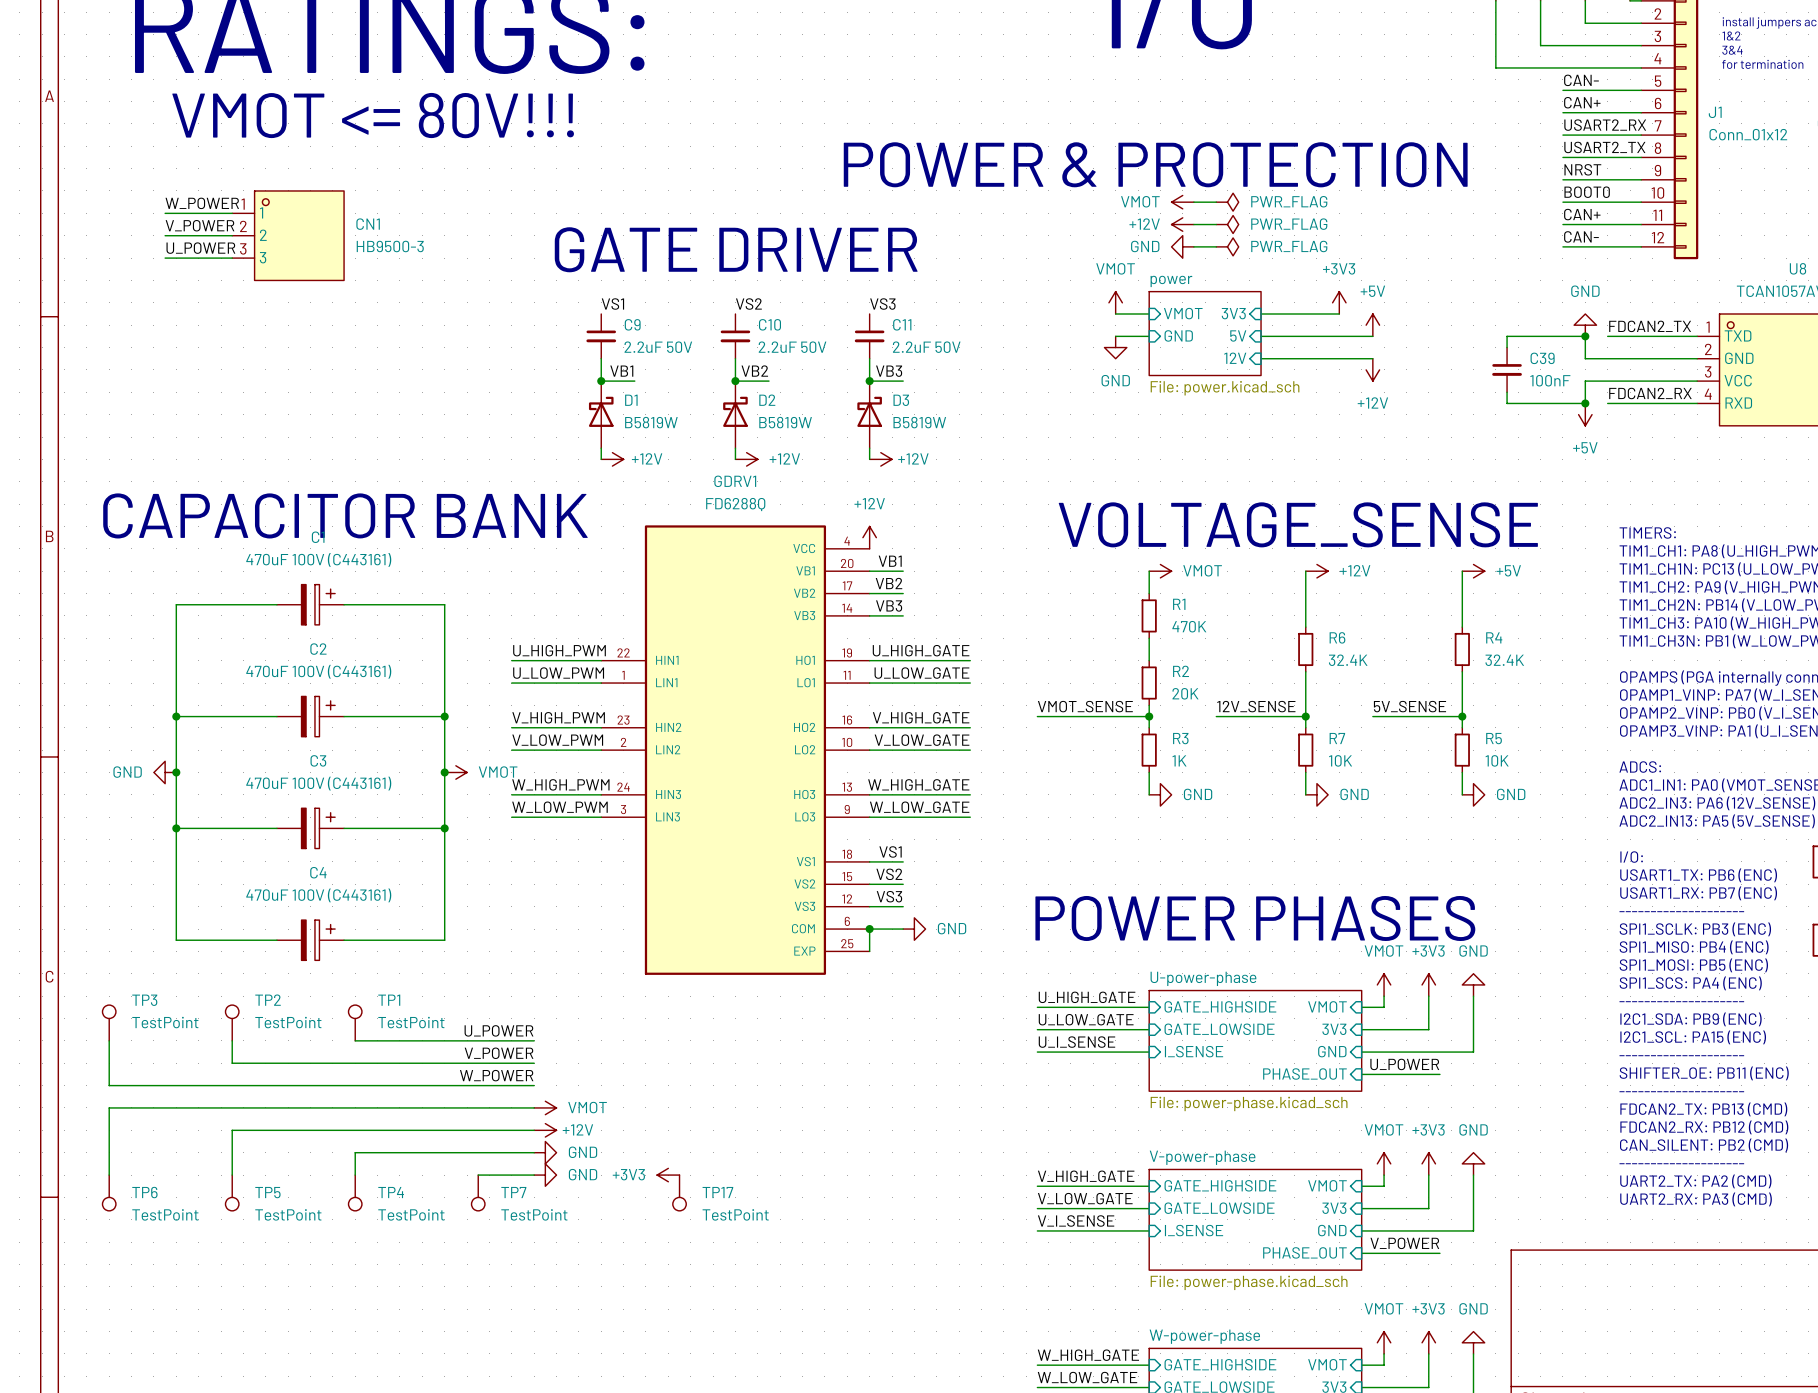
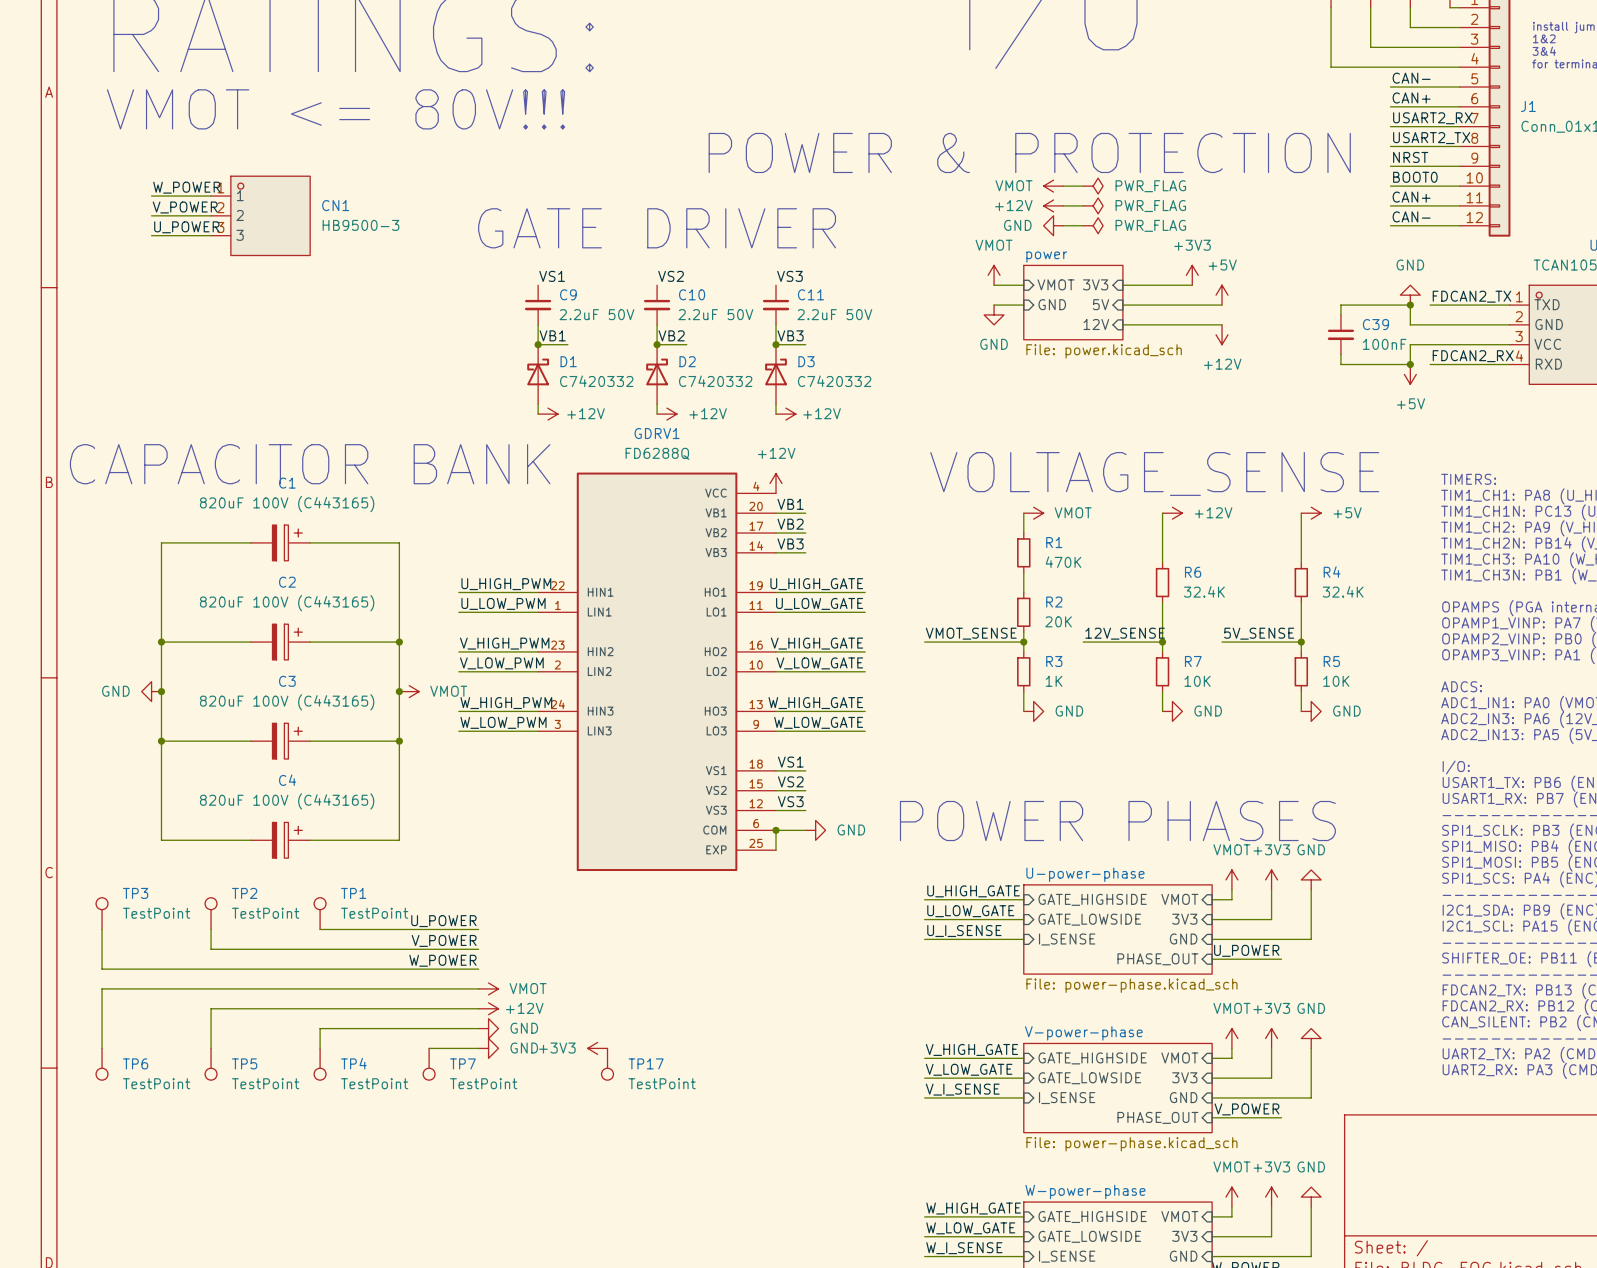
D1 value: B5819W (651, 422) -> C7420332 (596, 381)
D2 value: B5819W (785, 422) -> C7420332 (715, 381)
D3 value: B5819W (919, 422) -> C7420332 (834, 381)
C1 value: 470uF 100V (C443161) (318, 559) -> 820uF 100V (C443165) (287, 504)
C2 value: 470uF 100V (C443161) (318, 671) -> 820uF 100V (C443165) (287, 603)
C3 value: 470uF 100V (C443161) (318, 783) -> 820uF 100V (C443165) (287, 702)
C4 value: 470uF 100V (C443161) (318, 895) -> 820uF 100V (C443165) (287, 801)

